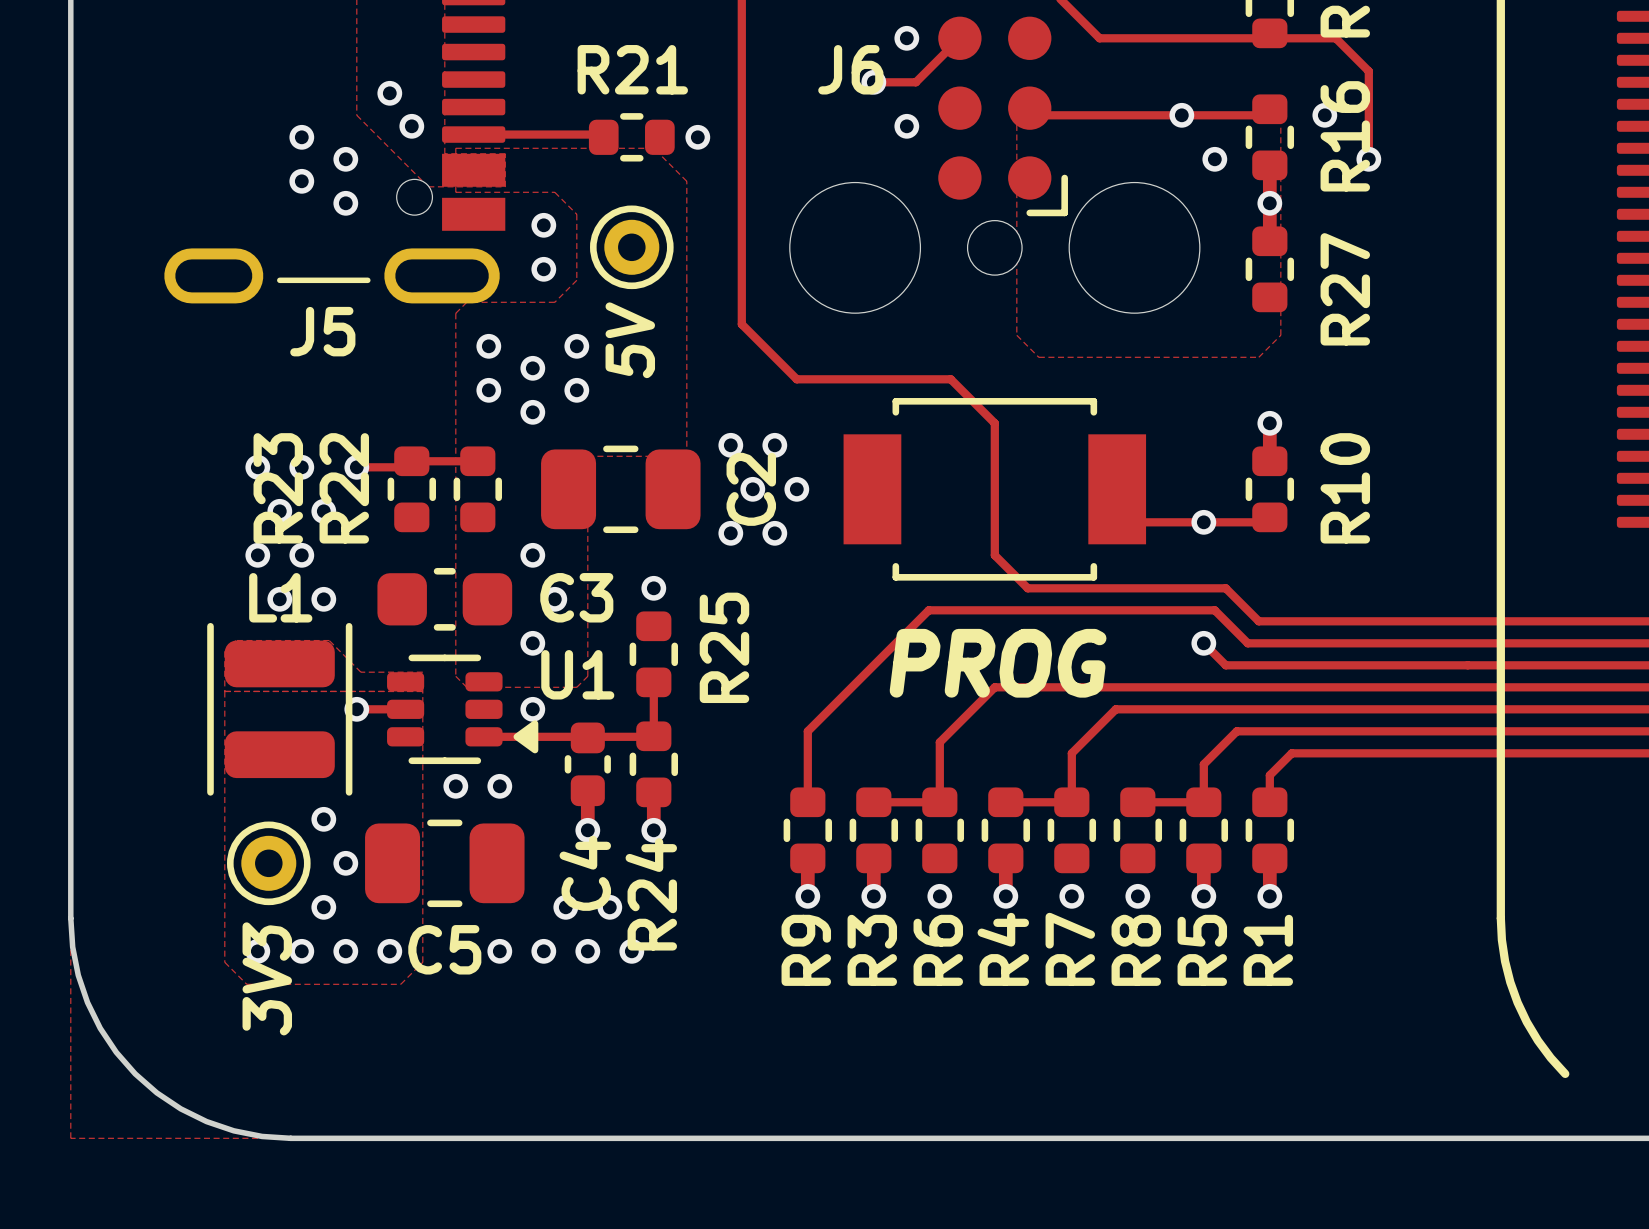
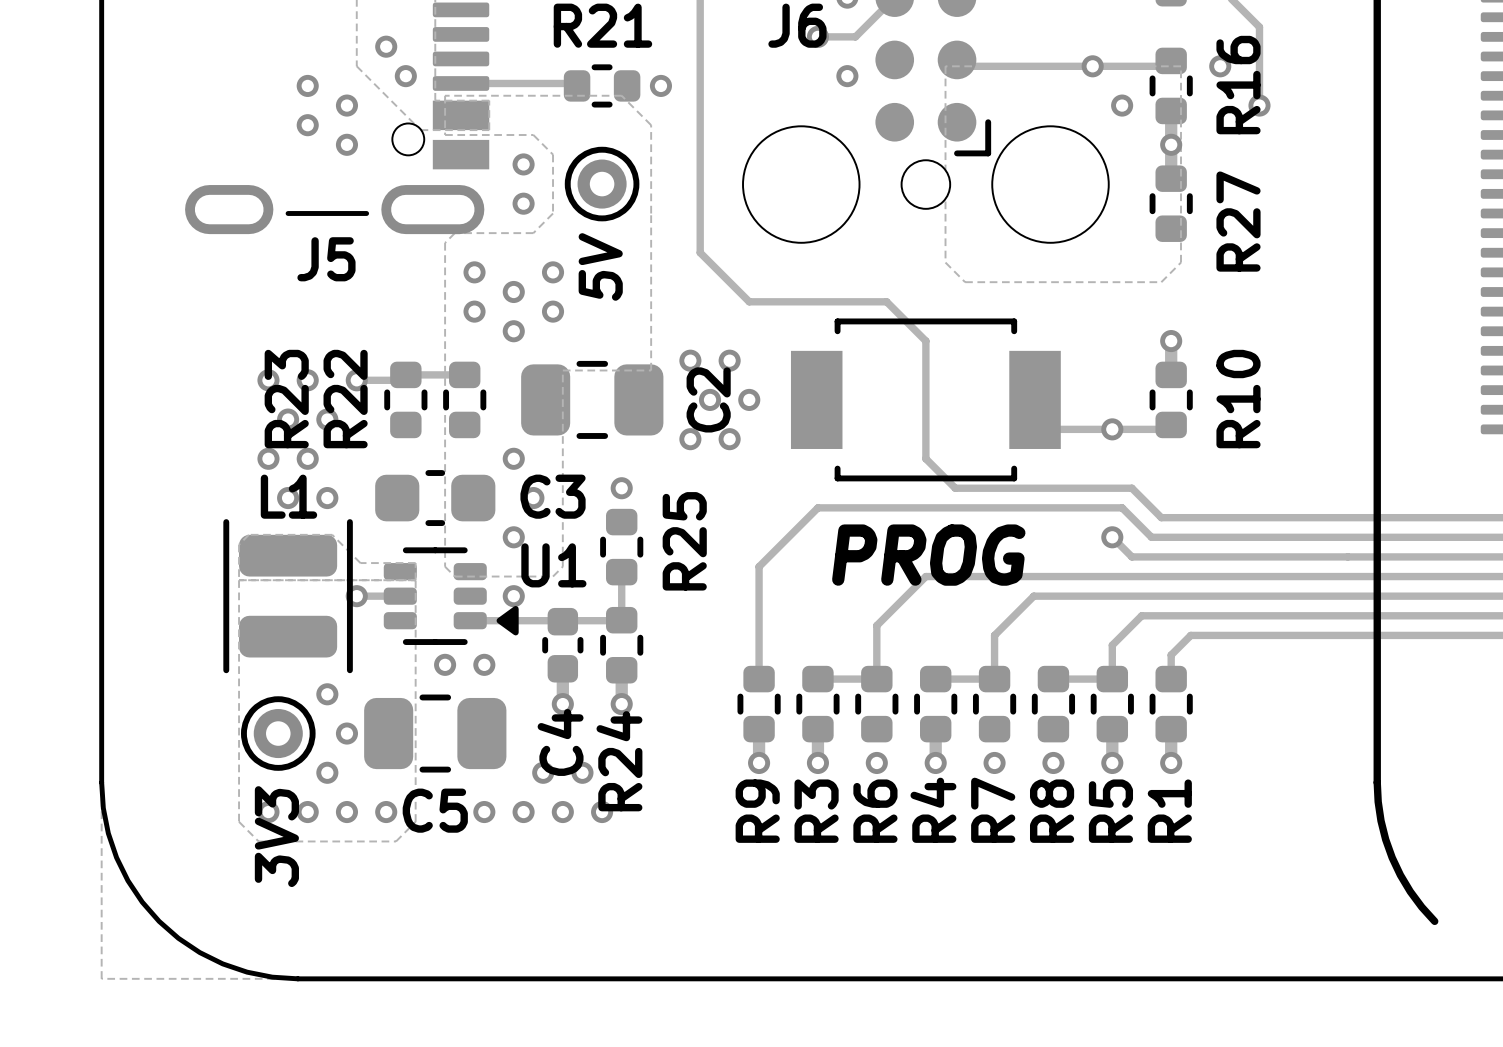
track: (928, 610) (807, 731) -> (867, 507) (817, 507) (759, 566) (759, 615)

